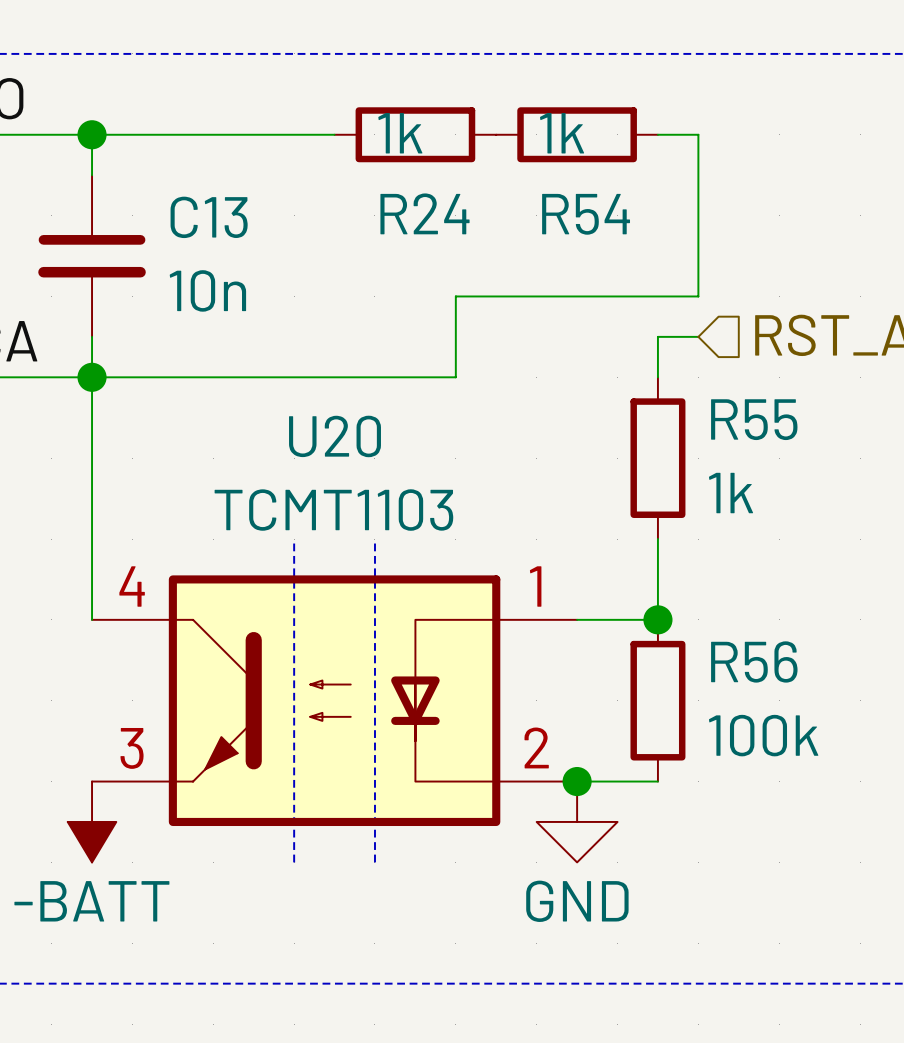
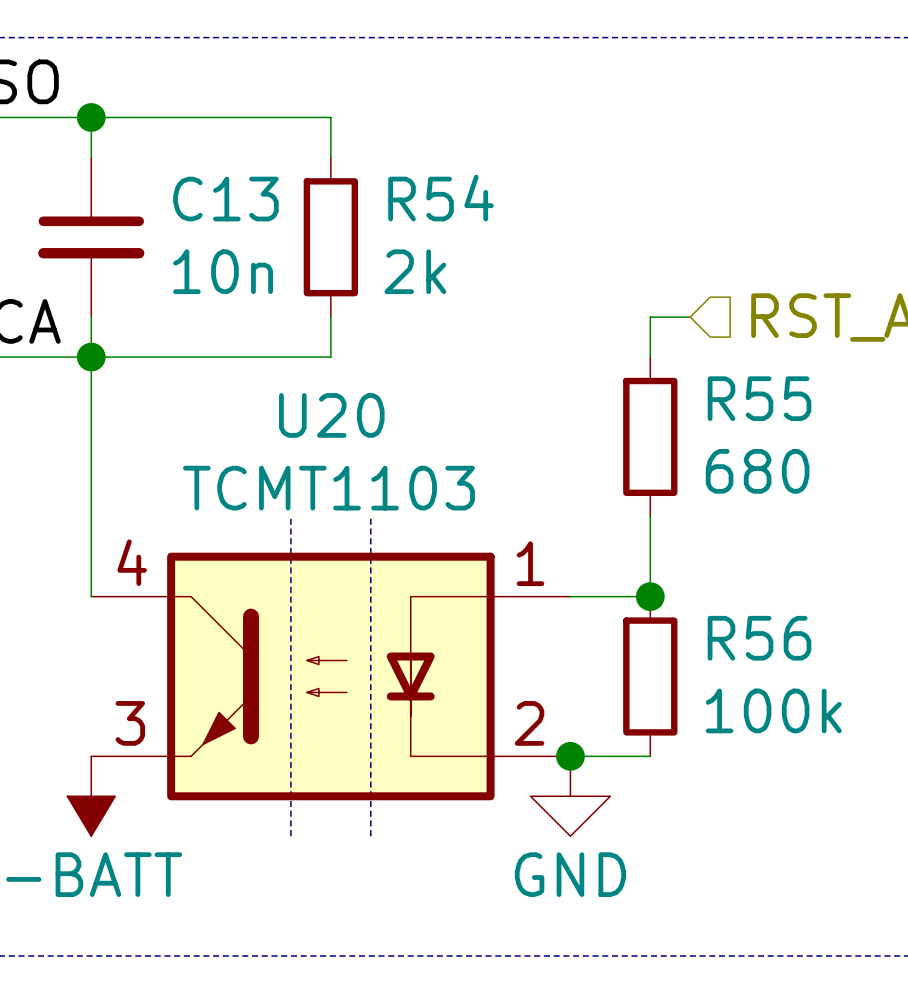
R54 value: 1k (562, 133) -> 2k (415, 271)
wire: none -> (330, 117) (330, 157)
R24: 1k (415, 134) -> none
R54 rotation: 0° (577, 134) -> 90° clockwise (330, 237)
R54 position: (577, 134) -> (330, 237)
wire: (657, 134) (698, 134) (698, 296) (455, 296) (455, 377) (334, 377) -> (330, 317) (330, 357)
R54 name position: R54 (586, 214) -> R54 (441, 198)
R55 value: 1k (731, 493) -> 680 (757, 471)

